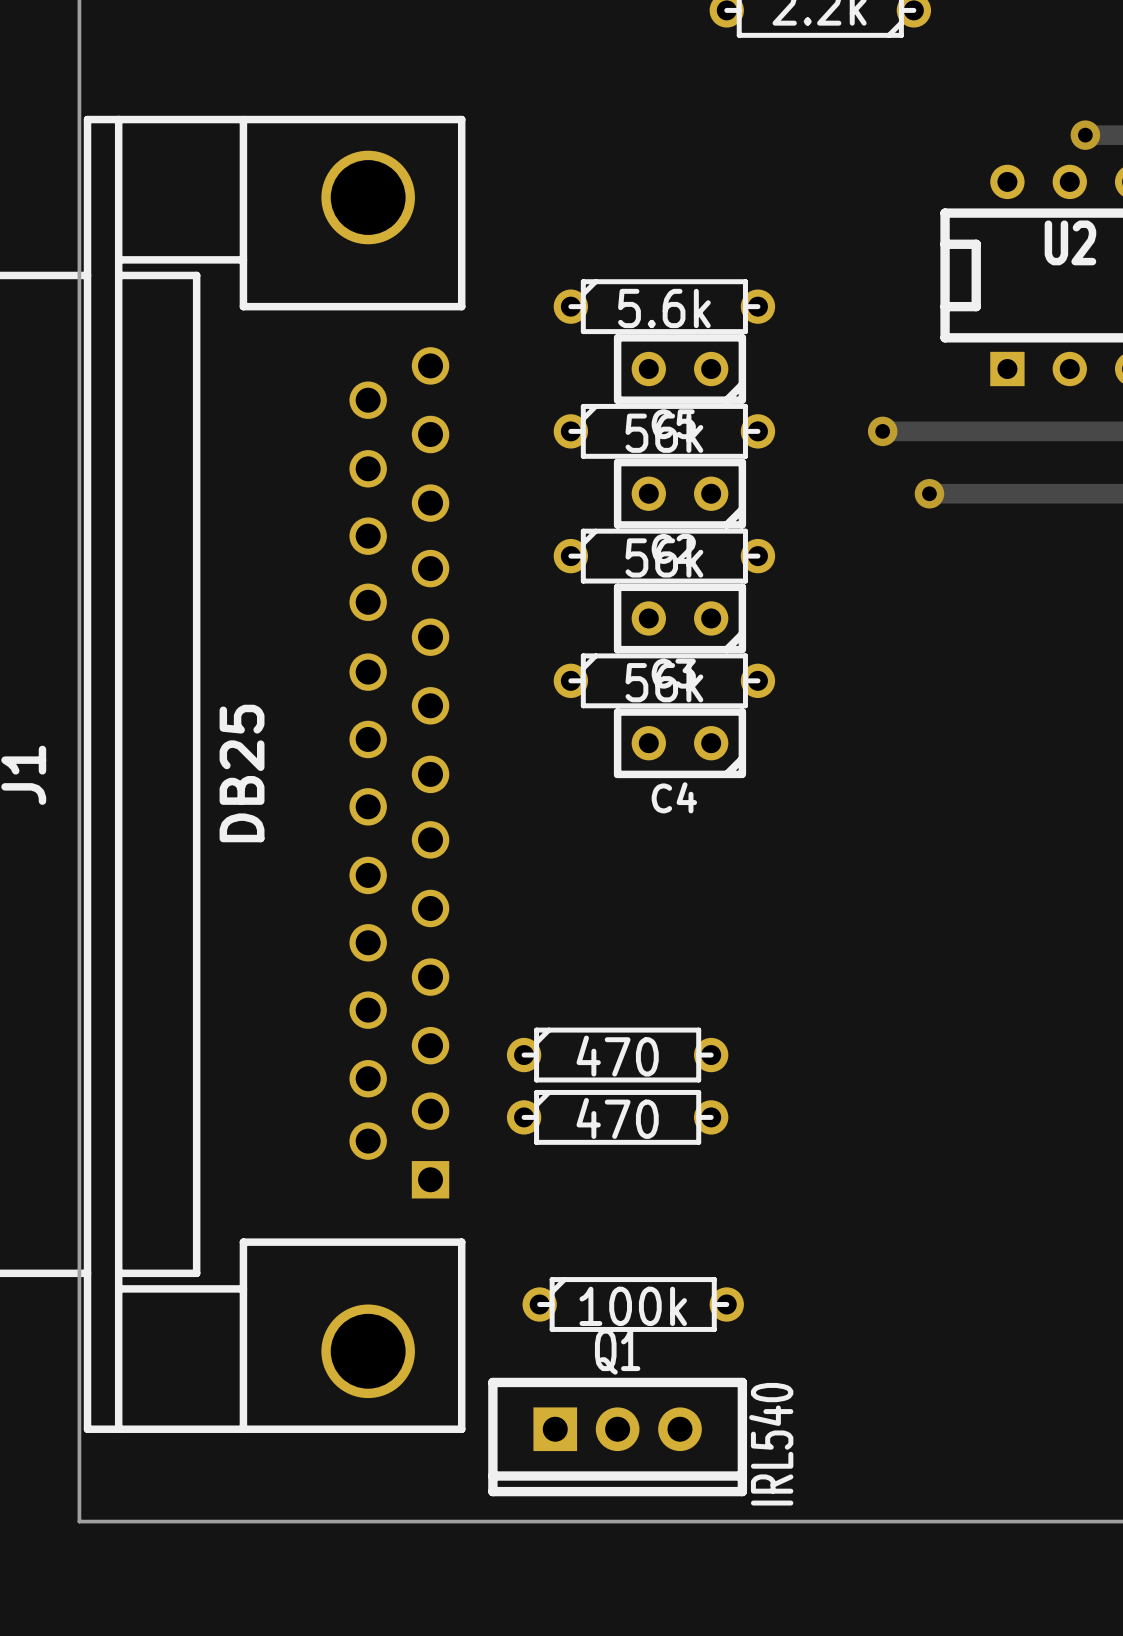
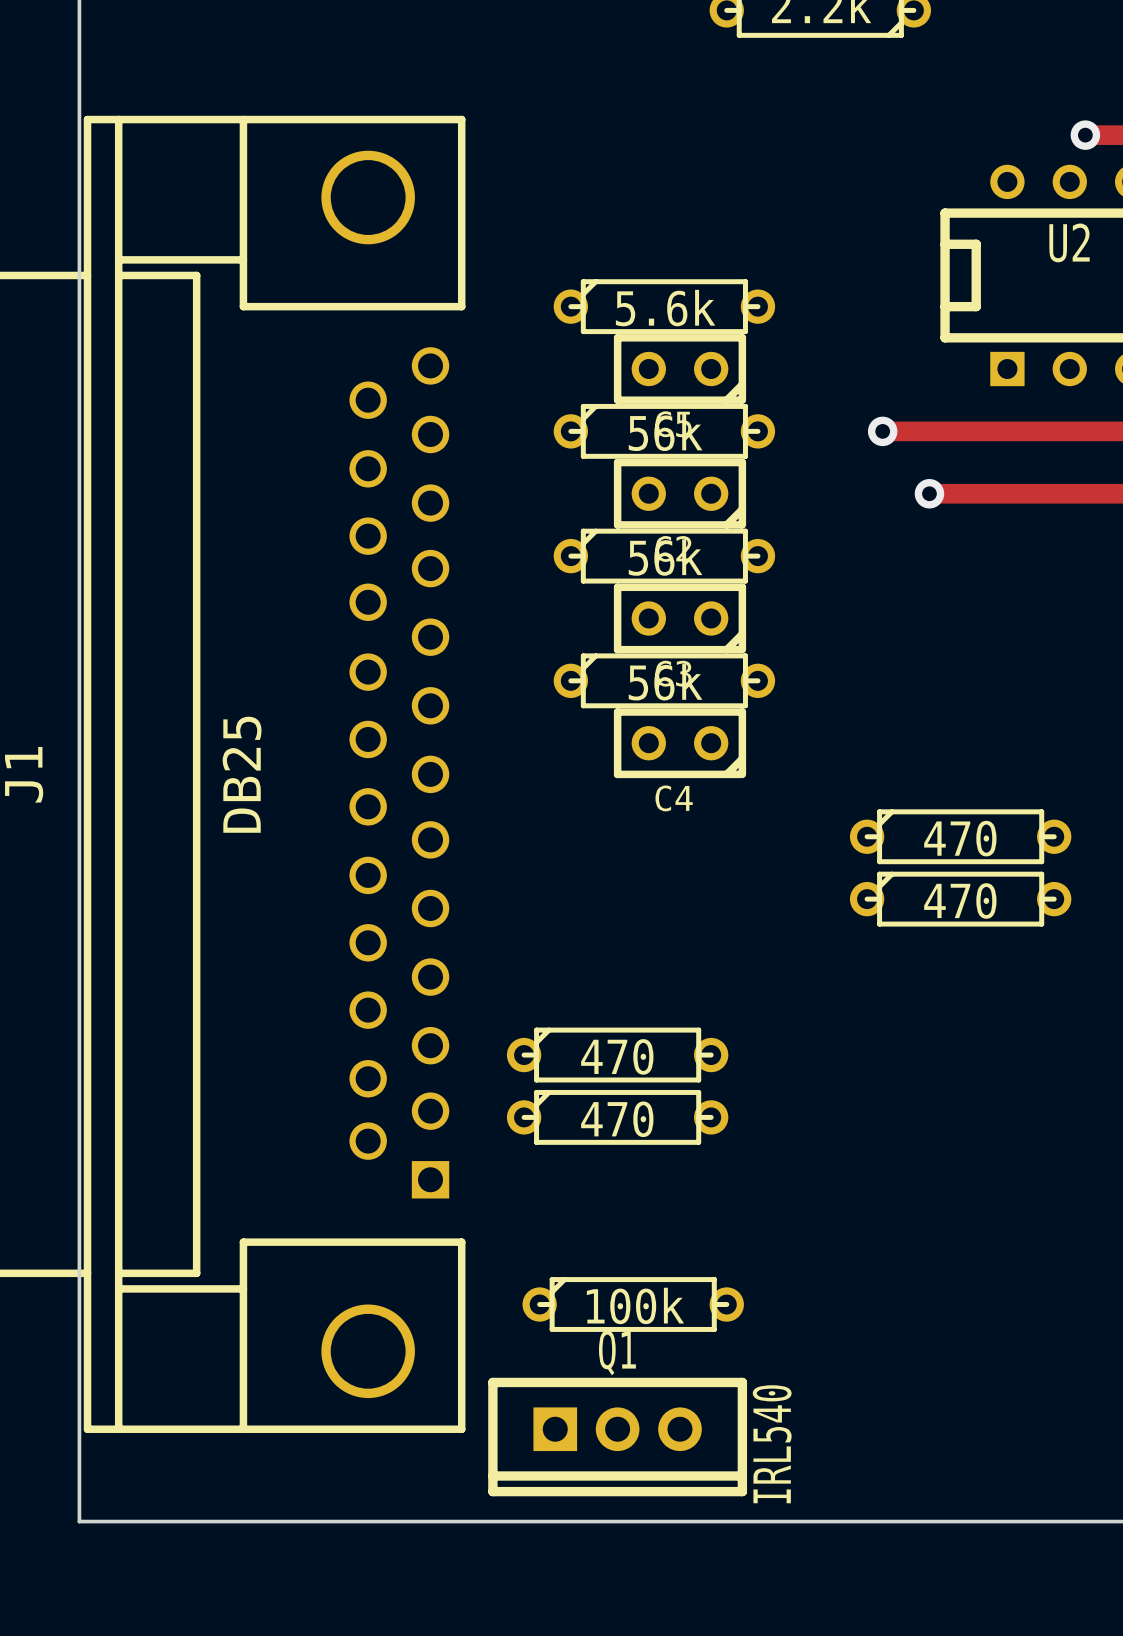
part: none -> 470 (960, 836)
part: none -> 470 (960, 899)

